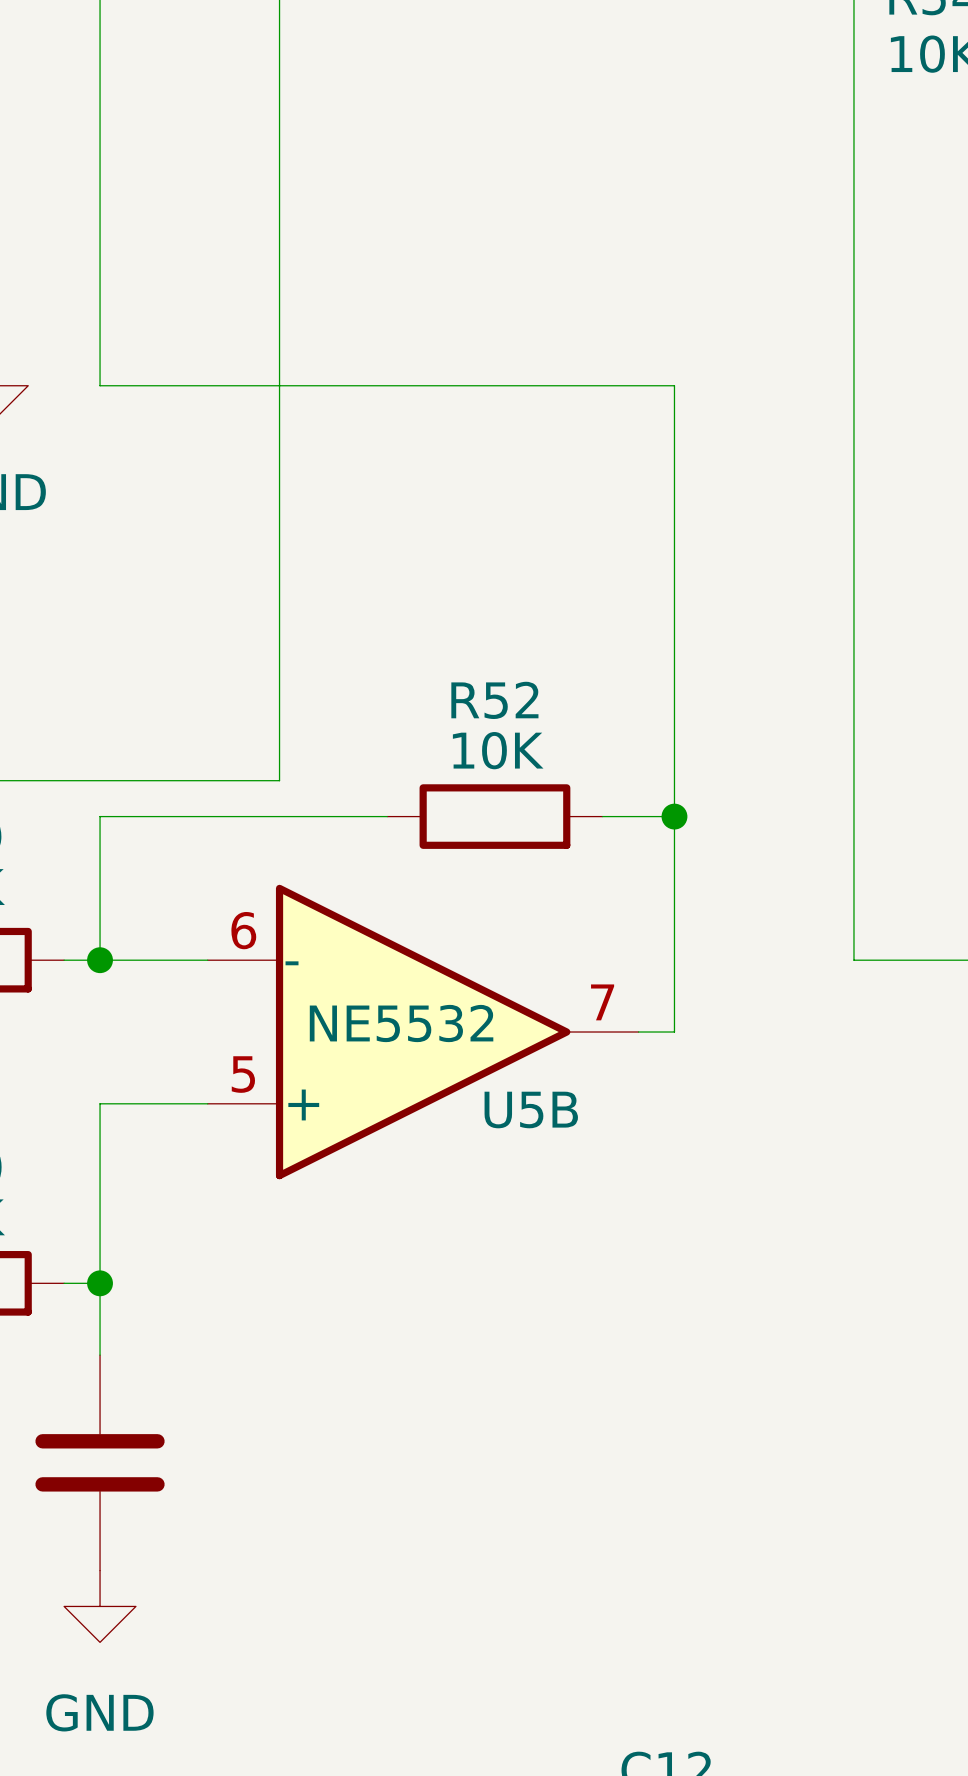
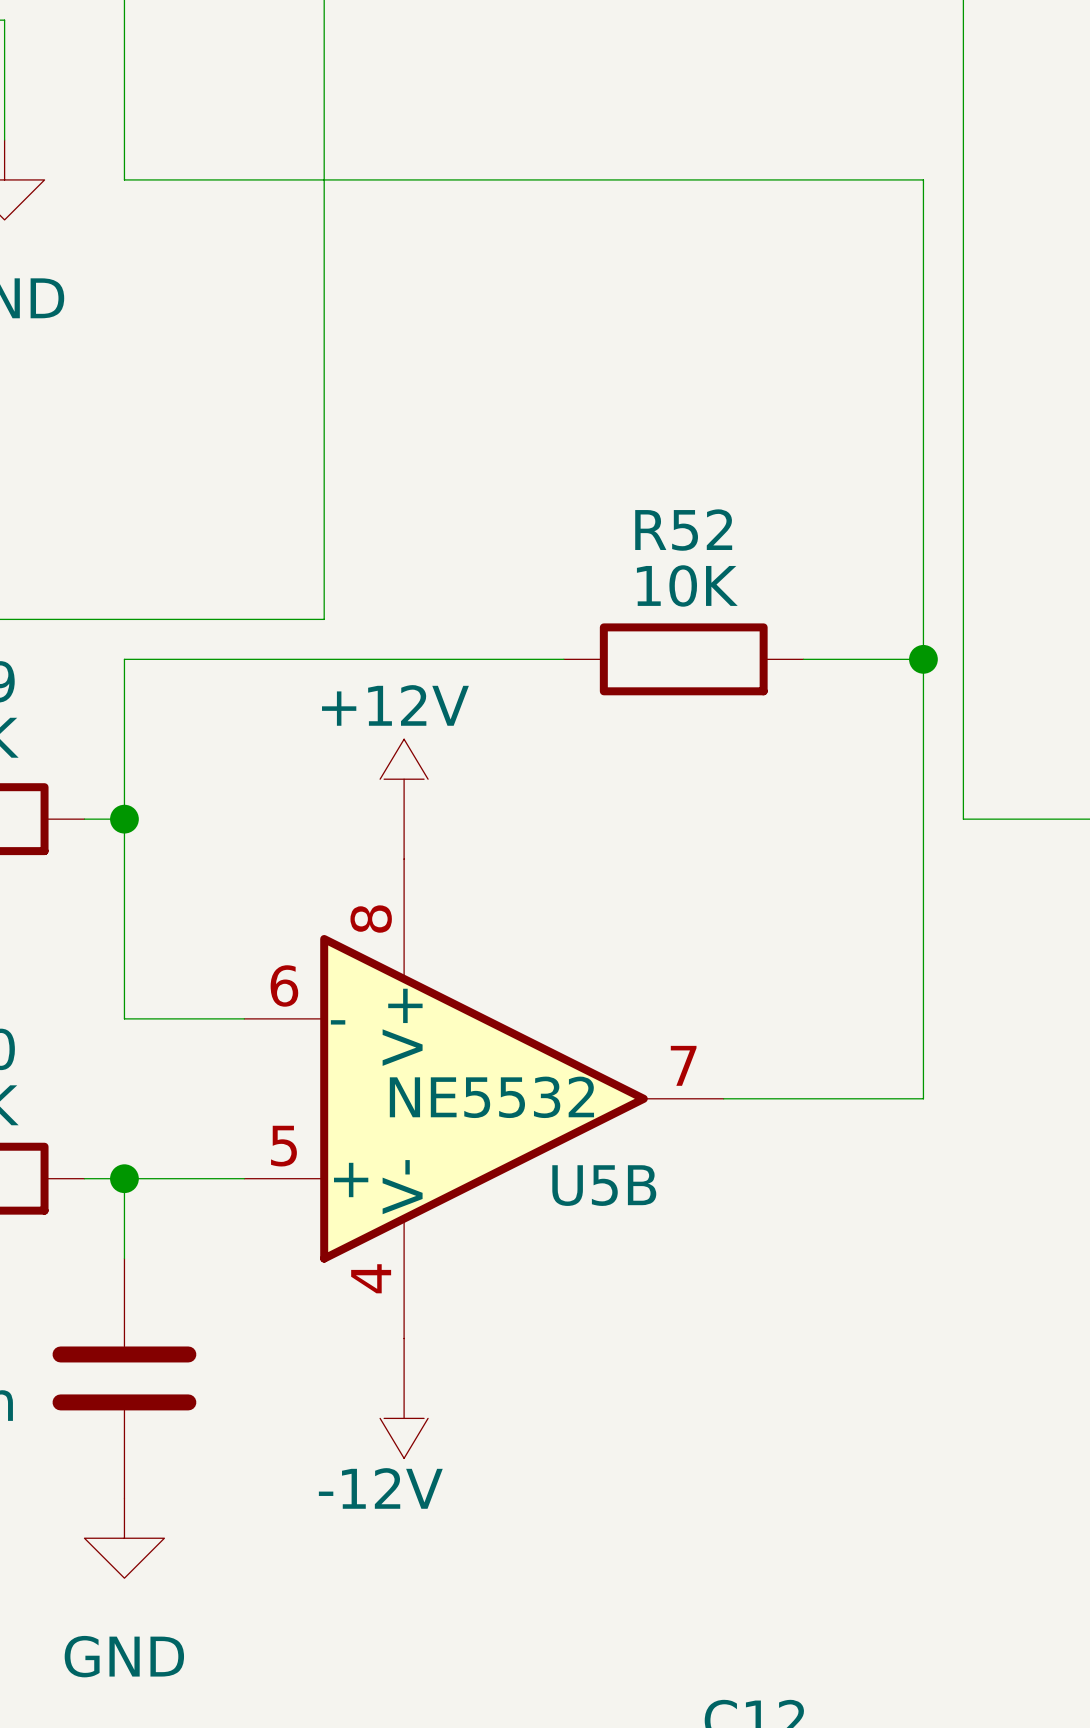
wire: (674, 385) (674, 1032) (638, 1032) -> (763, 179) (923, 179) (923, 1098) (723, 1098)
wire: none -> (444, 659) (563, 659)
R52 position: (494, 816) -> (683, 659)
wire: (602, 816) (674, 816) -> none
junction position: (674, 816) -> (923, 659)
wire: none -> (803, 659) (923, 659)
part: none -> +12V (404, 799)
wire: (100, 960) (207, 960) -> (124, 819) (124, 978)
U5B value position: NE5532 (401, 1023) -> NE5532 (491, 1097)
U5B position: (423, 1032) -> (483, 1098)
wire: (100, 1103) (207, 1103) -> (124, 1178) (244, 1178)
wire: (100, 1139) (100, 1283) -> (124, 1018) (244, 1018)
part: none -> (404, 1098)
part: none -> -12V (404, 1398)

